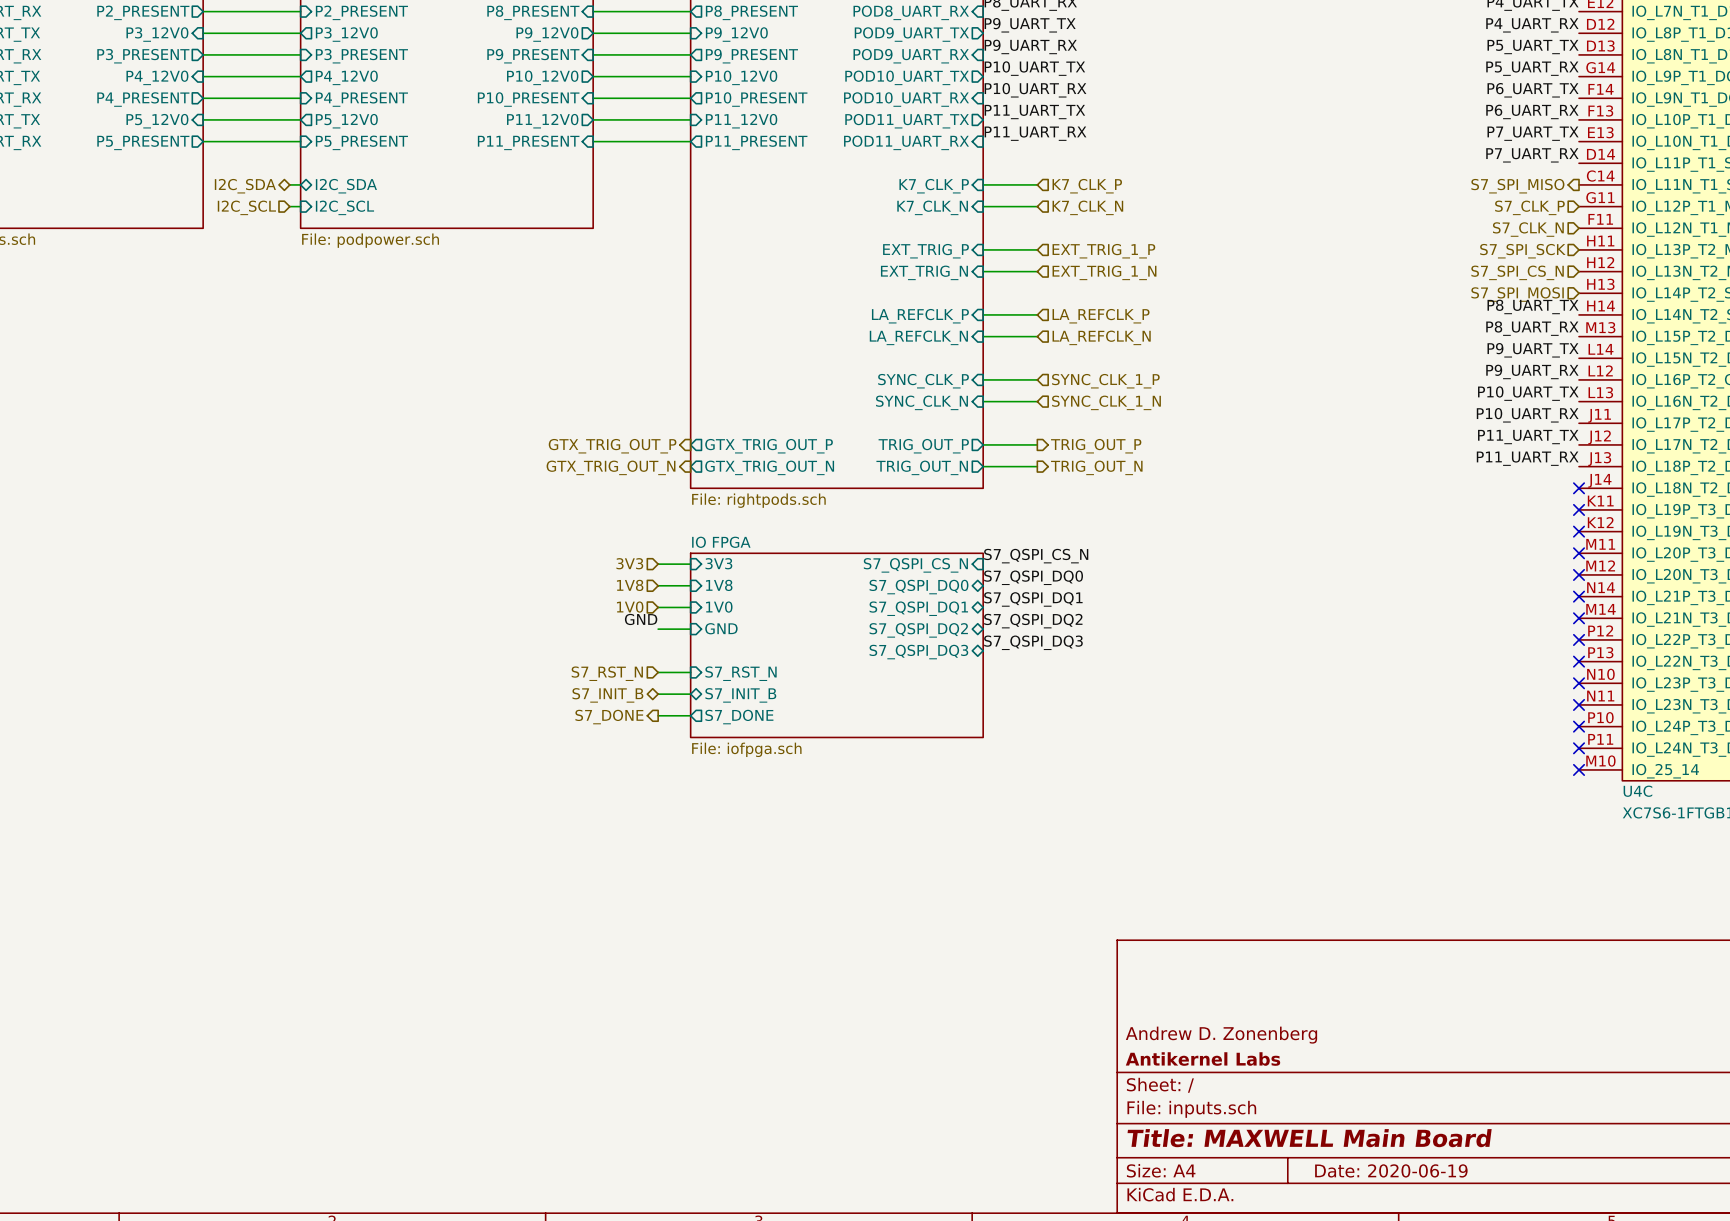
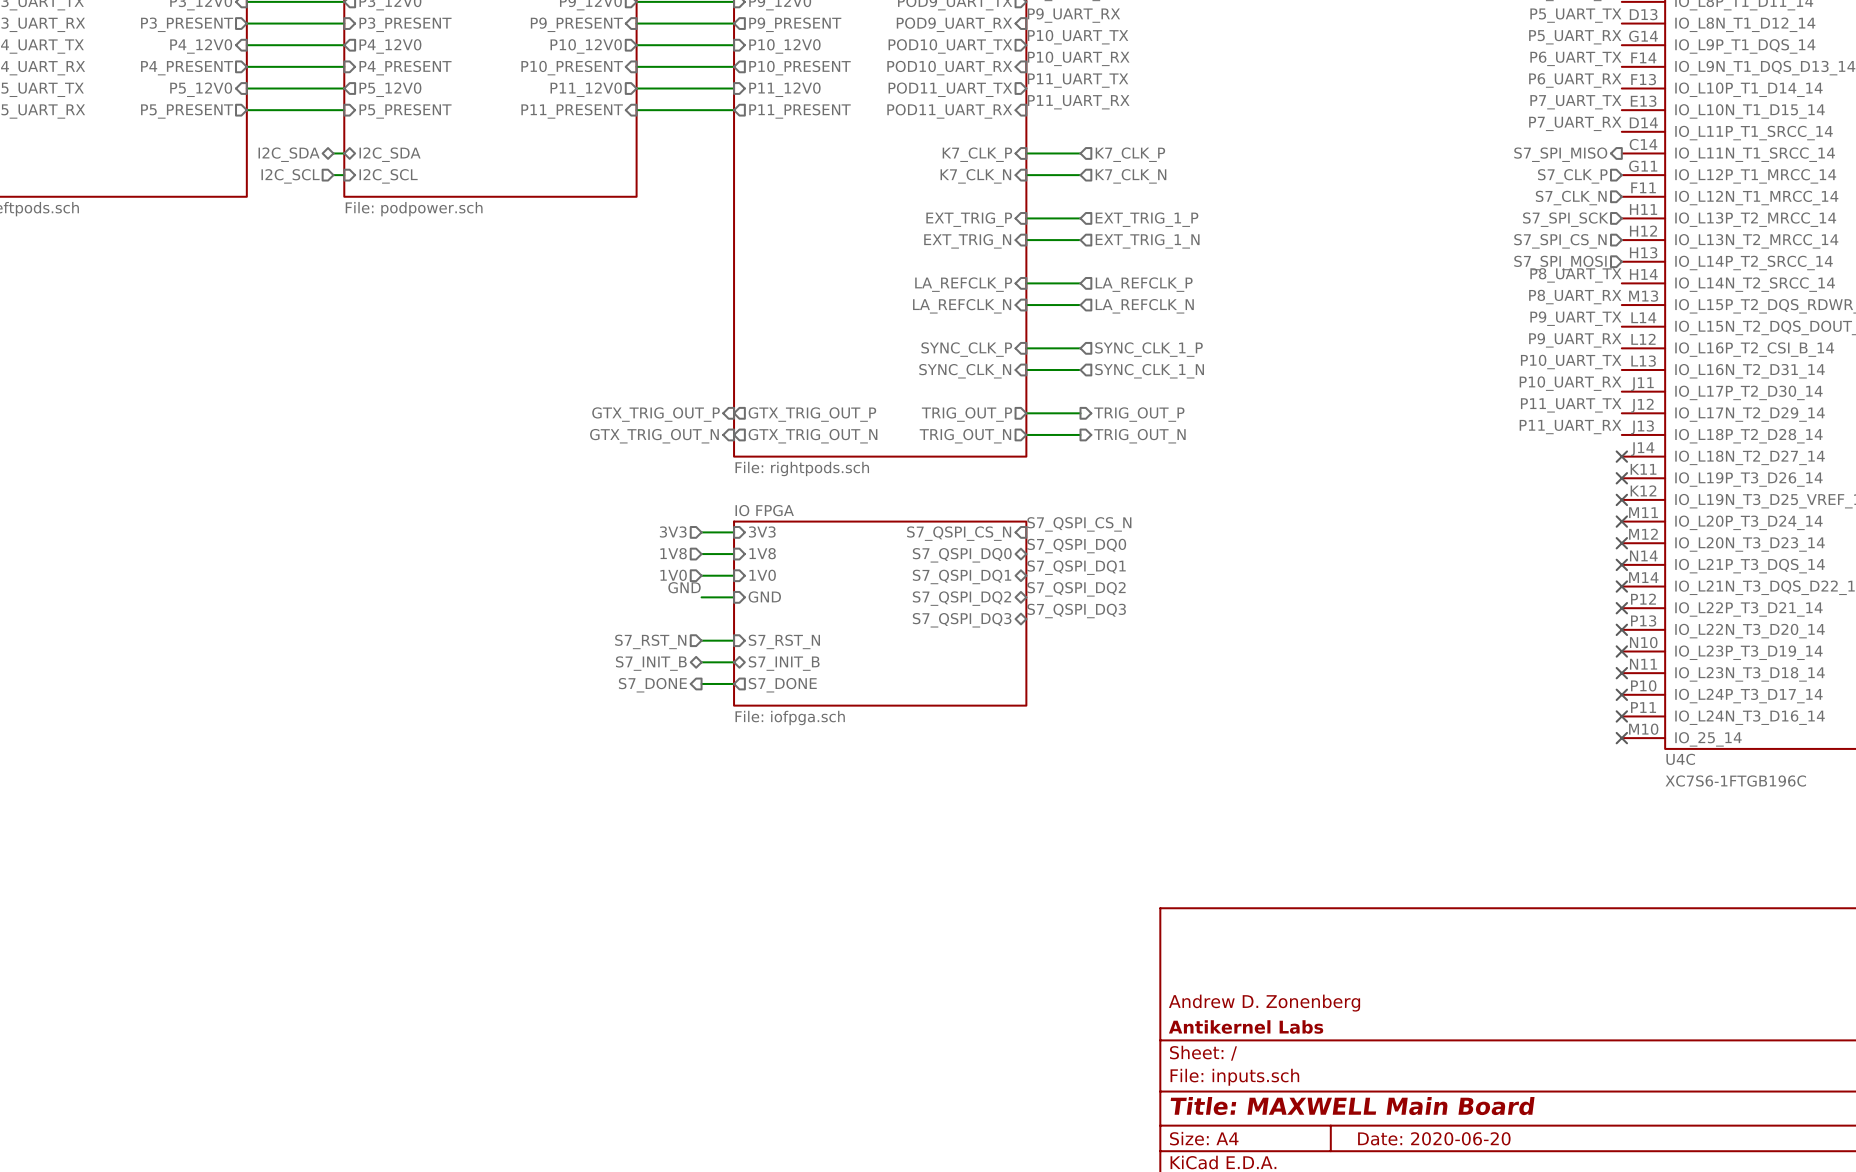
title block: Date: 2020-06-19 (1391, 1170) -> Date: 2020-06-20 (1434, 1138)

